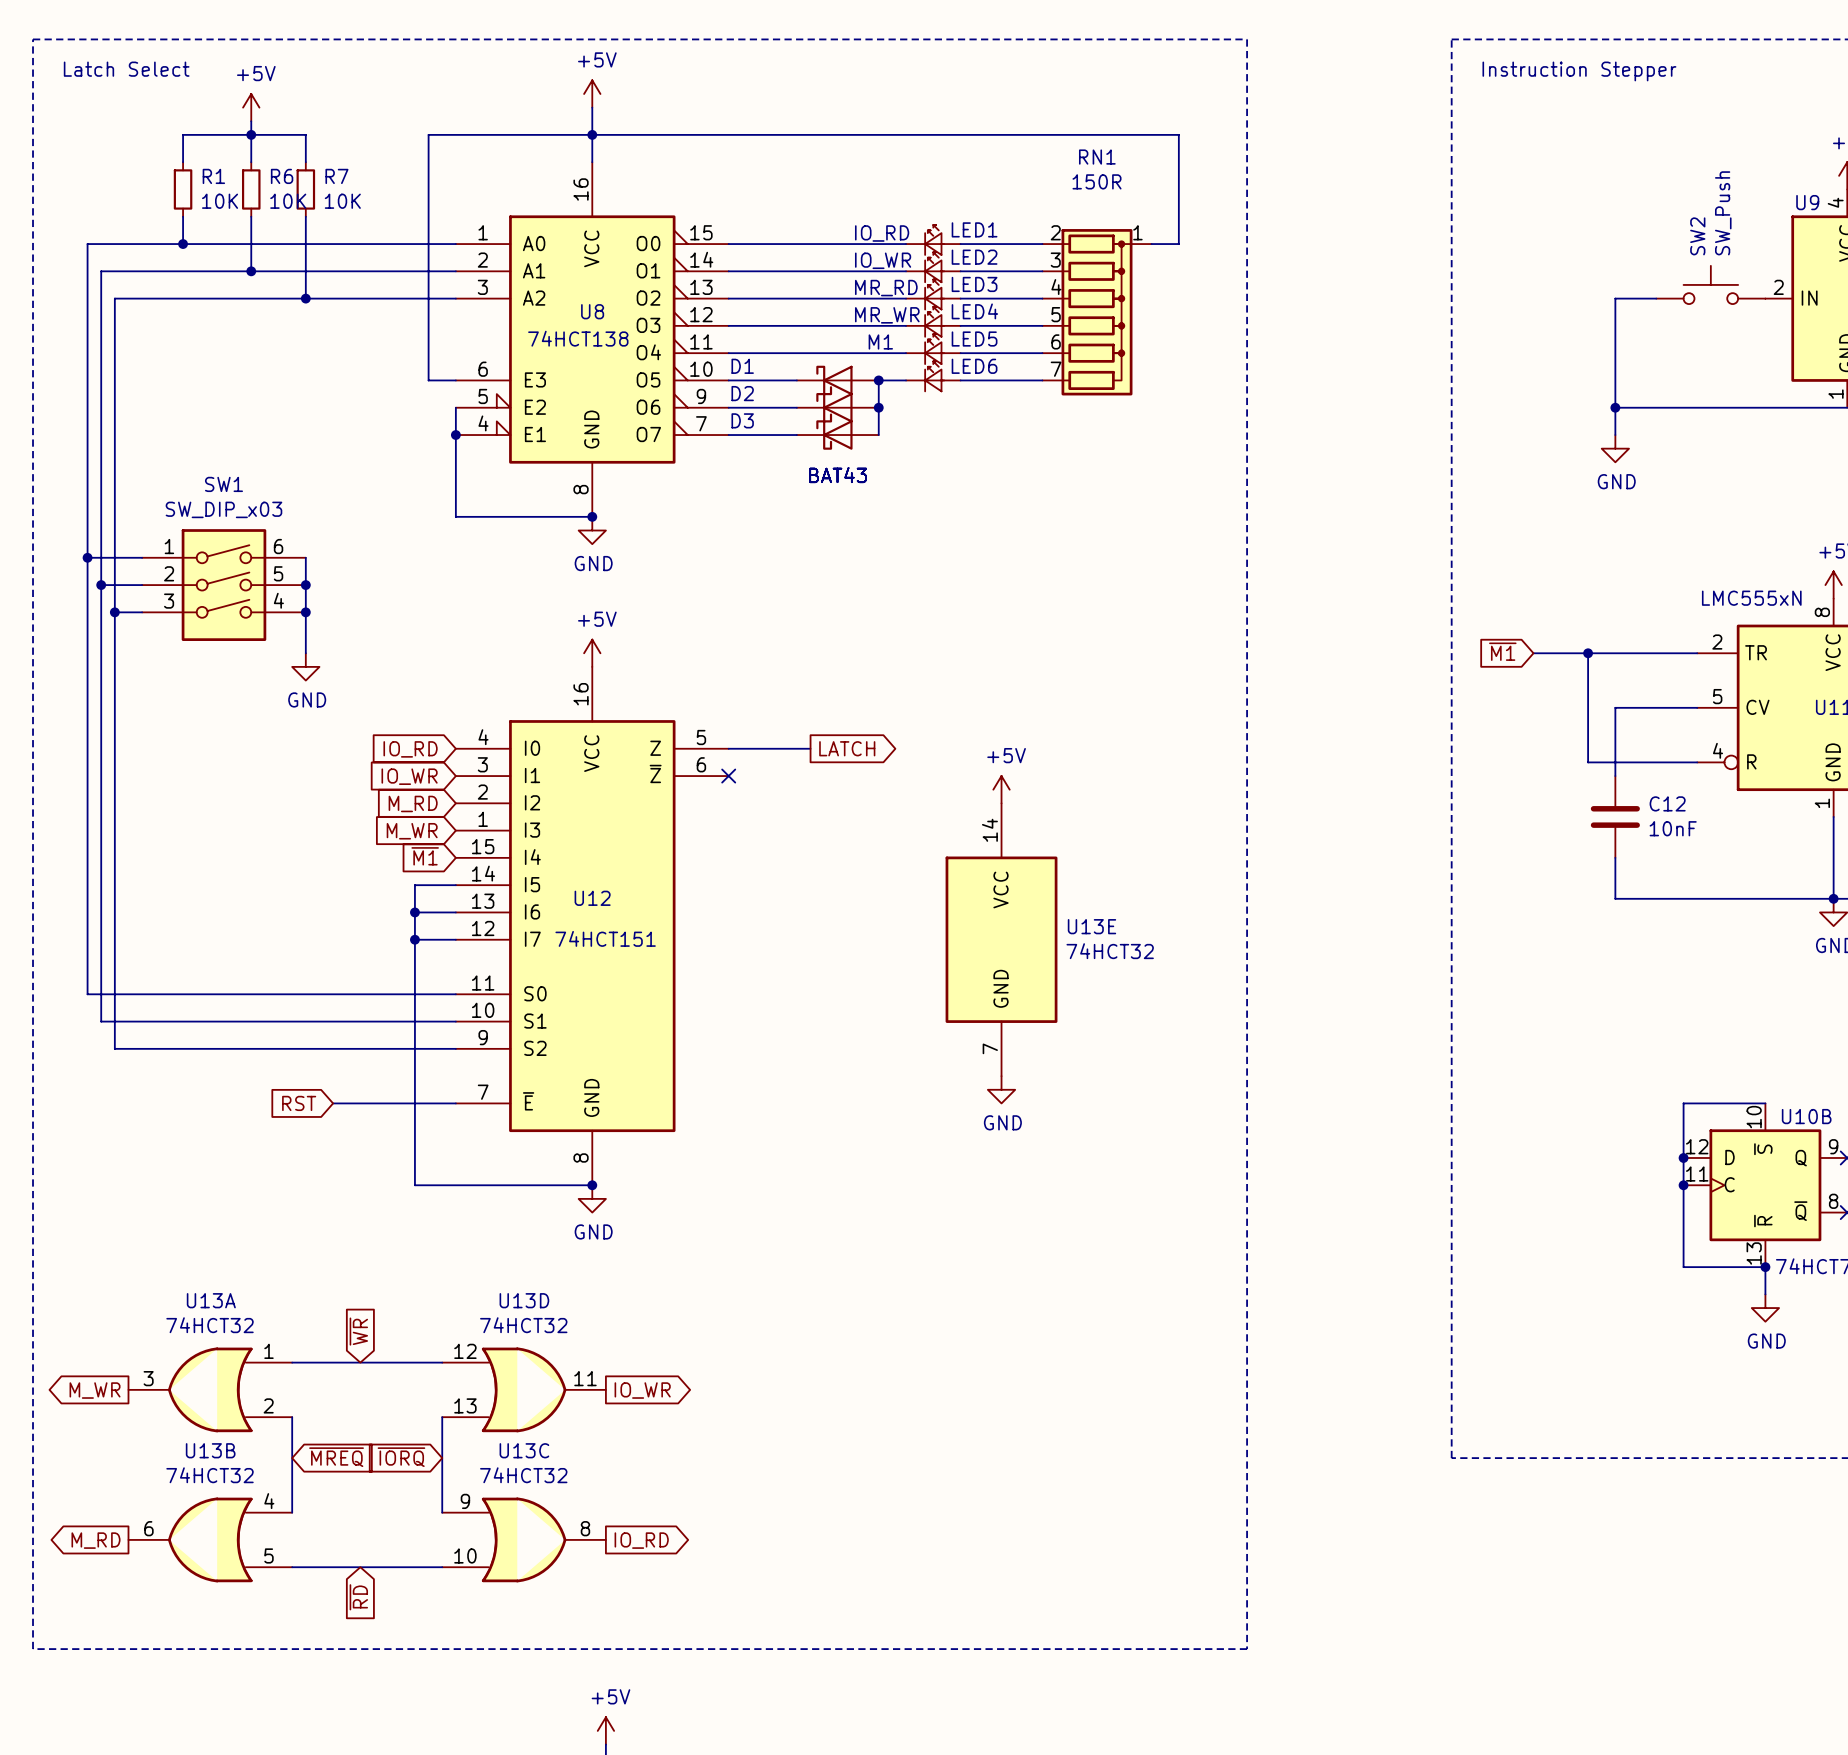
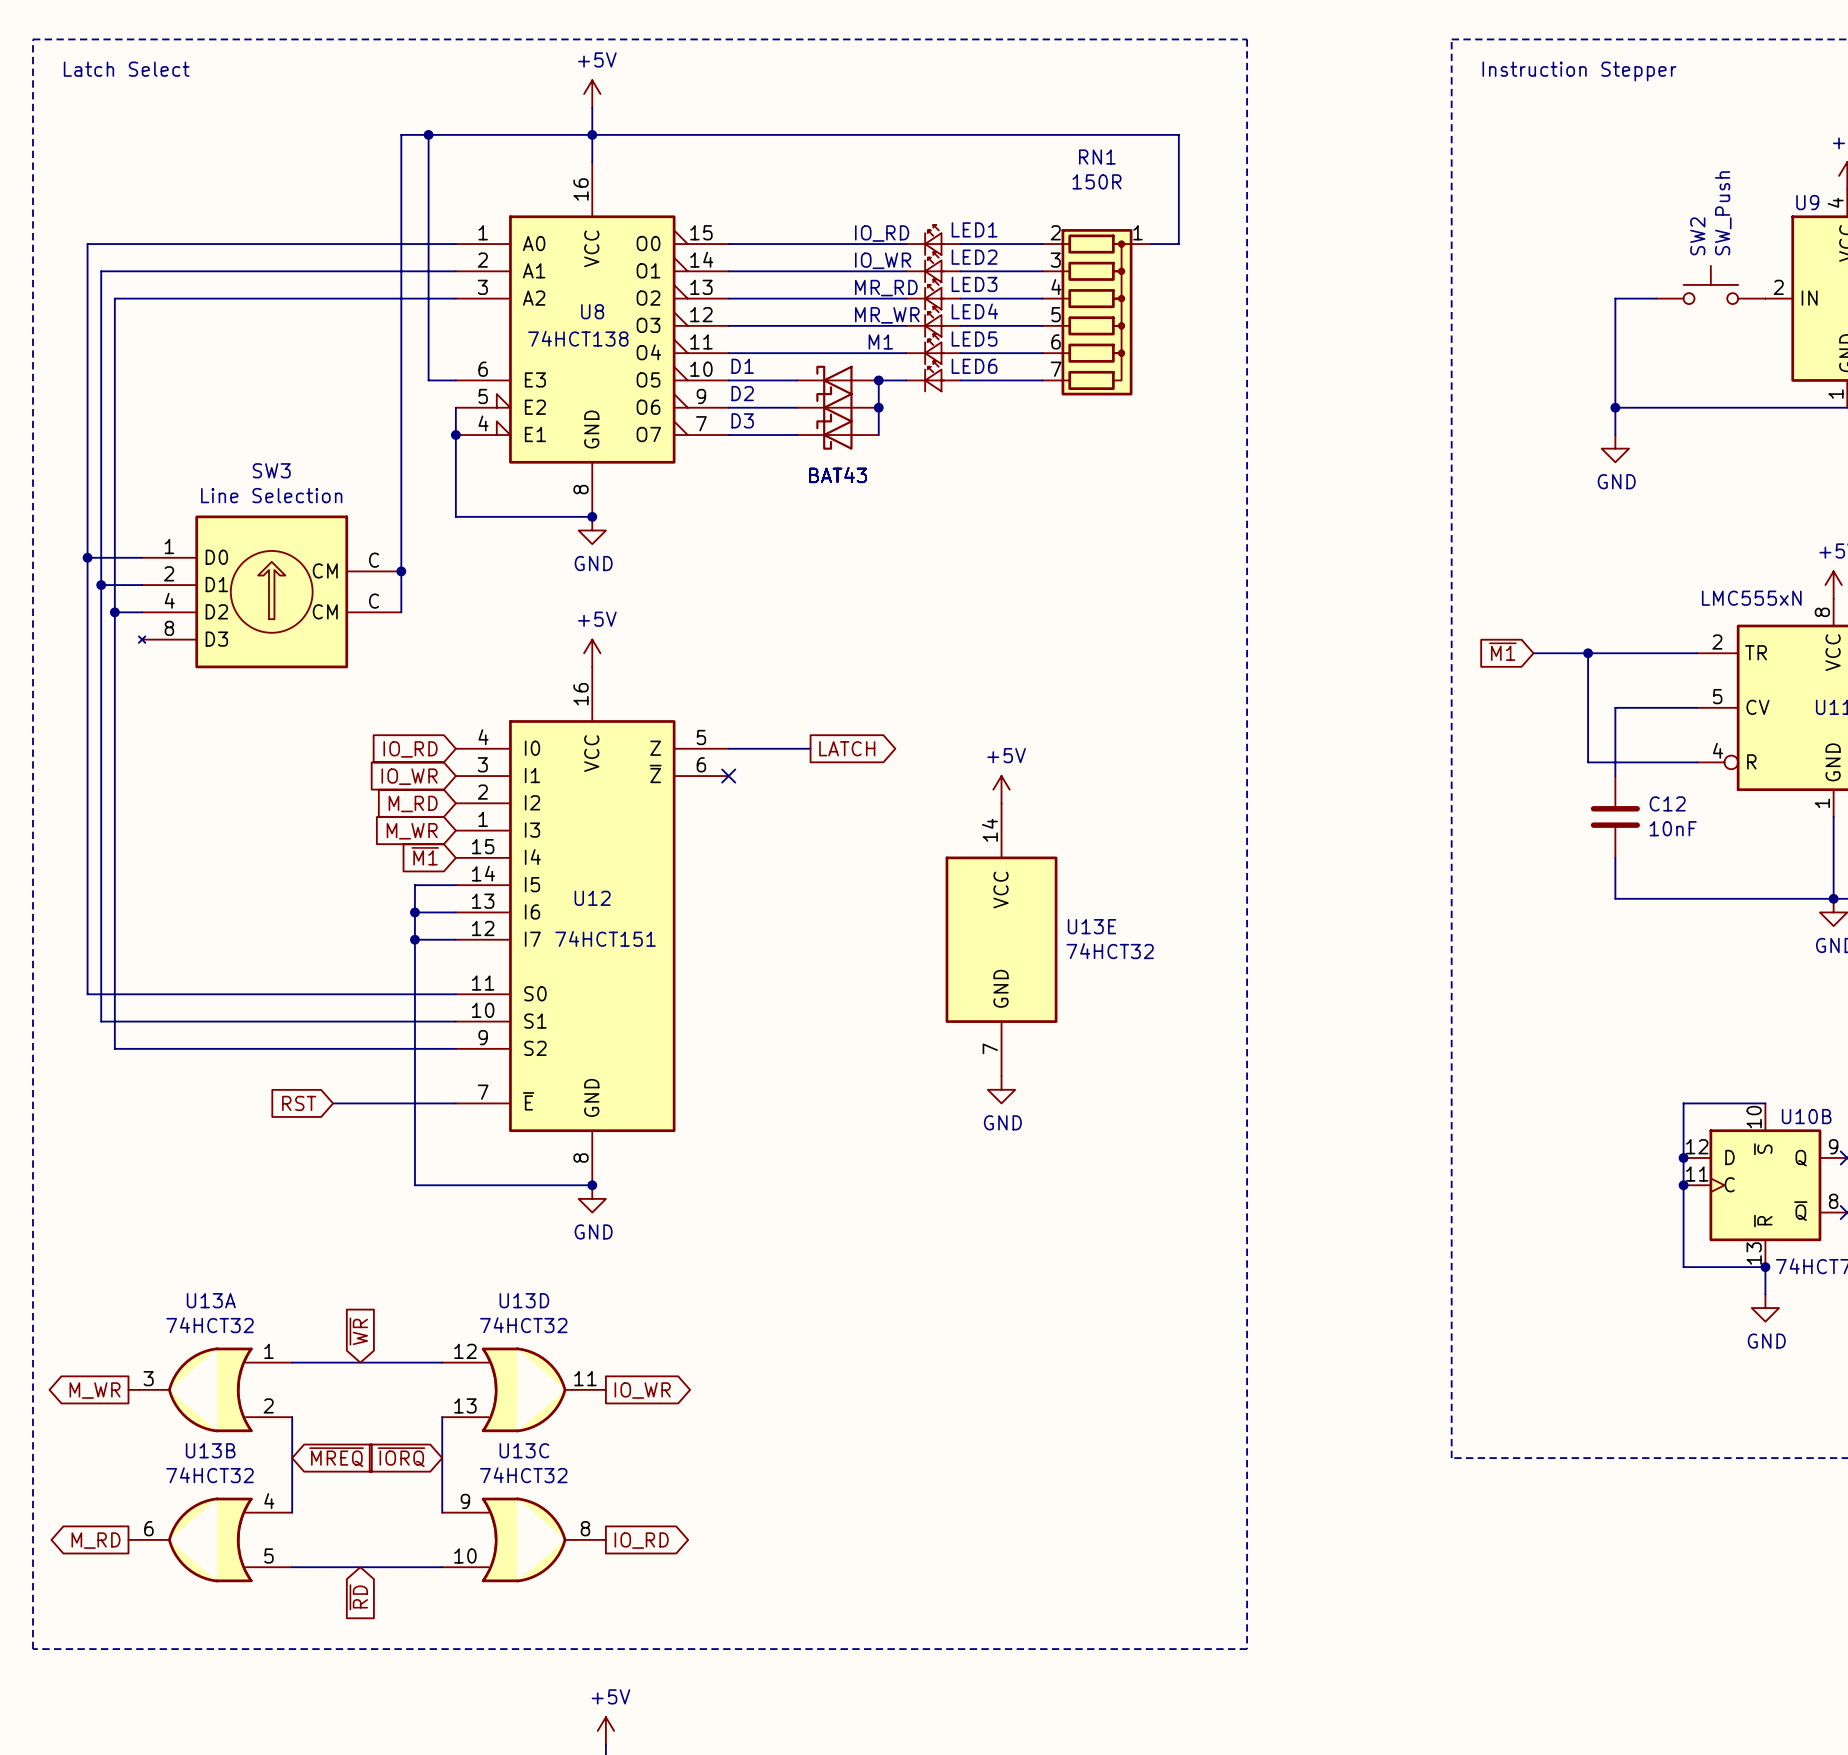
power symbol: +5V (251, 107) -> none
wire: (251, 121) (251, 162) -> none
junction: (251, 134) -> none
wire: none -> (428, 134) (401, 134) (401, 612)
junction: none -> (428, 134)
wire: (183, 162) (183, 134) (305, 134) (305, 162) -> none
R1: 10K (183, 189) -> none
R6: 10K (251, 189) -> none
R7: 10K (305, 189) -> none
wire: (183, 216) (183, 244) -> none
wire: (251, 216) (251, 271) -> none
wire: (305, 216) (305, 298) -> none
junction: (183, 244) -> none
junction: (251, 271) -> none
junction: (305, 298) -> none
junction: none -> (401, 571)
SW1: SW_DIP_x03 (223, 585) -> none
junction: (305, 585) -> none
SW3: none -> Line Selection (270, 591)
junction: (305, 612) -> none
power symbol: GND (305, 666) -> none

